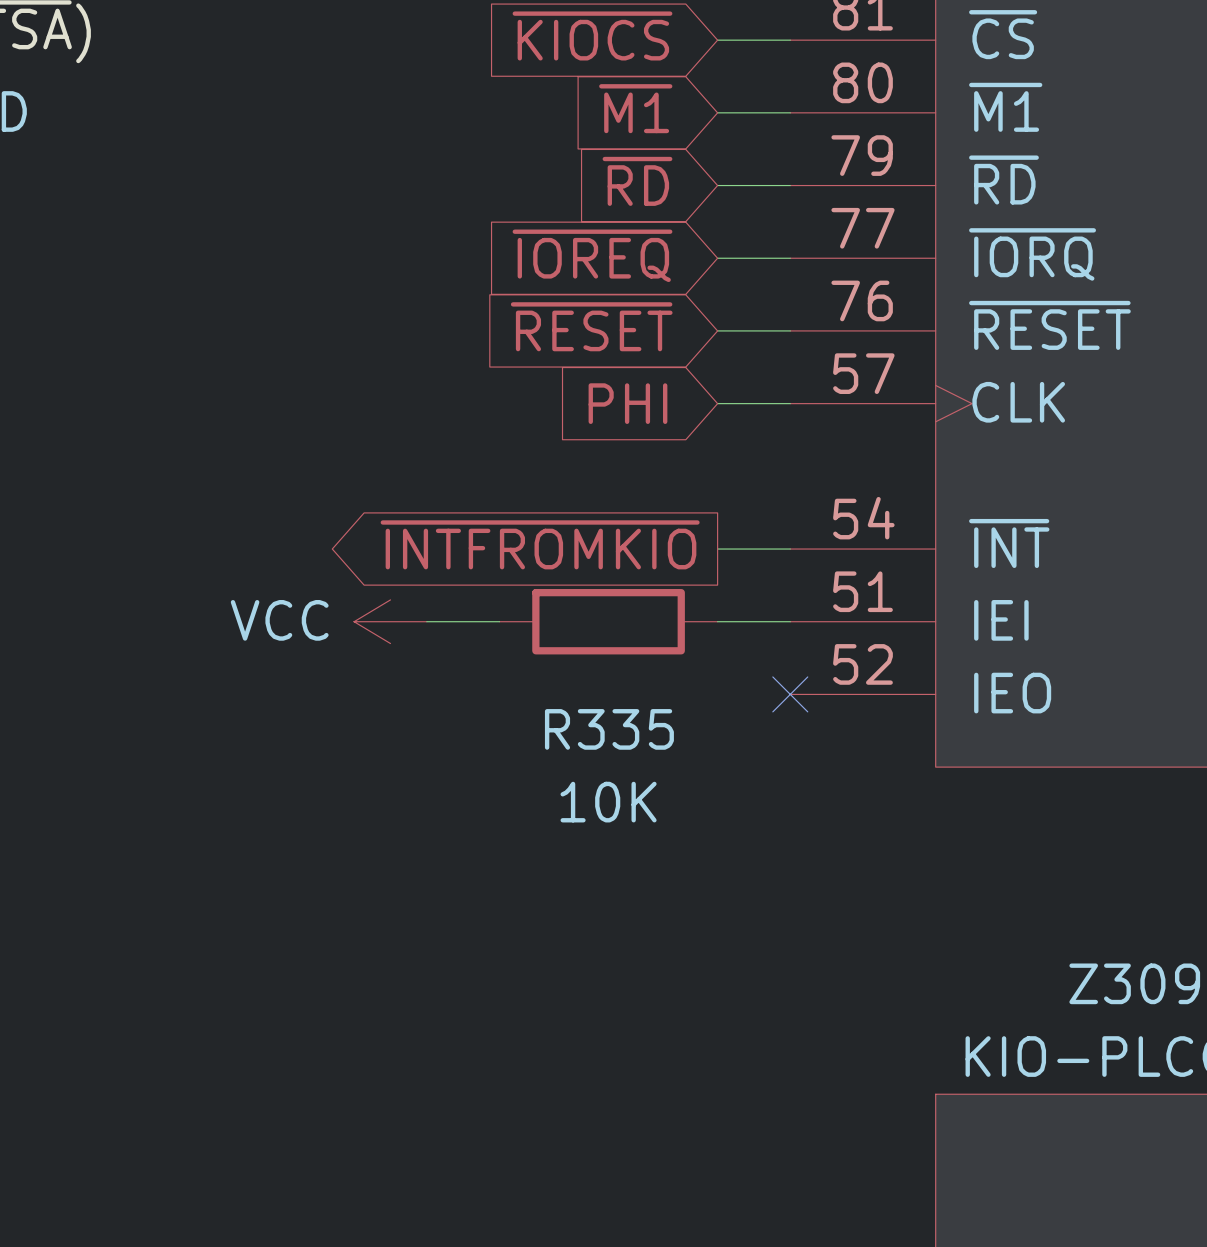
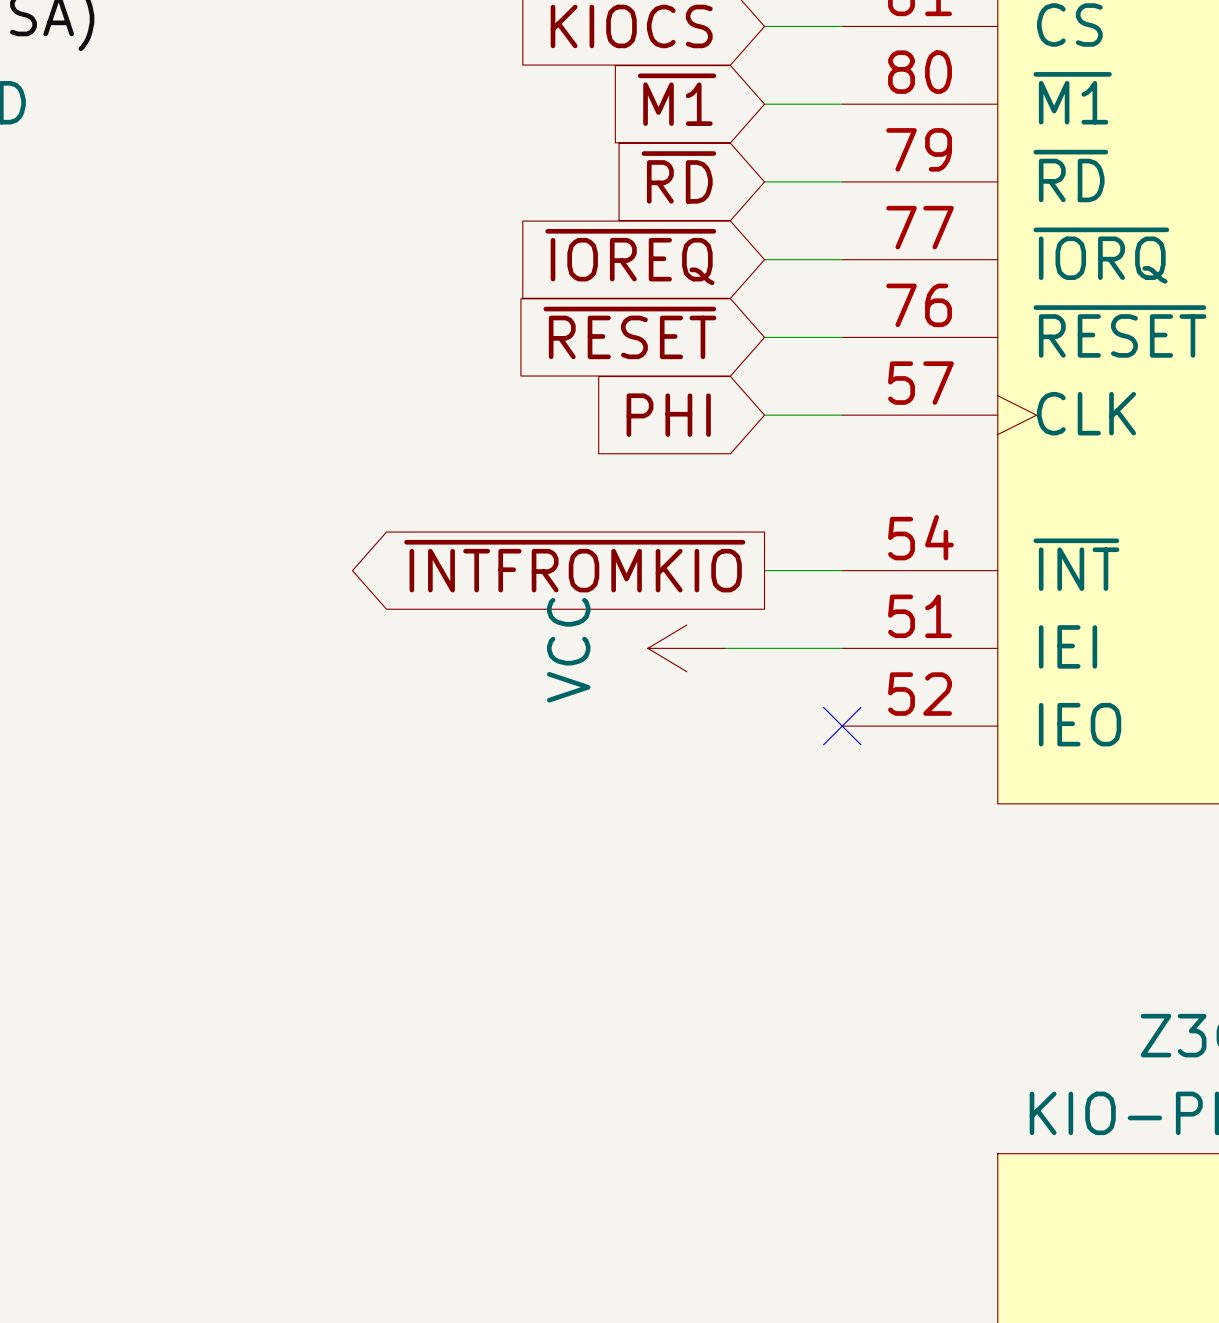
power symbol text rotation: 0° (279, 620) -> 90° counterclockwise (568, 650)
power symbol position: VCC (390, 621) -> VCC (686, 648)
wire: (426, 621) (499, 621) -> none
R335: 10K (608, 621) -> none

